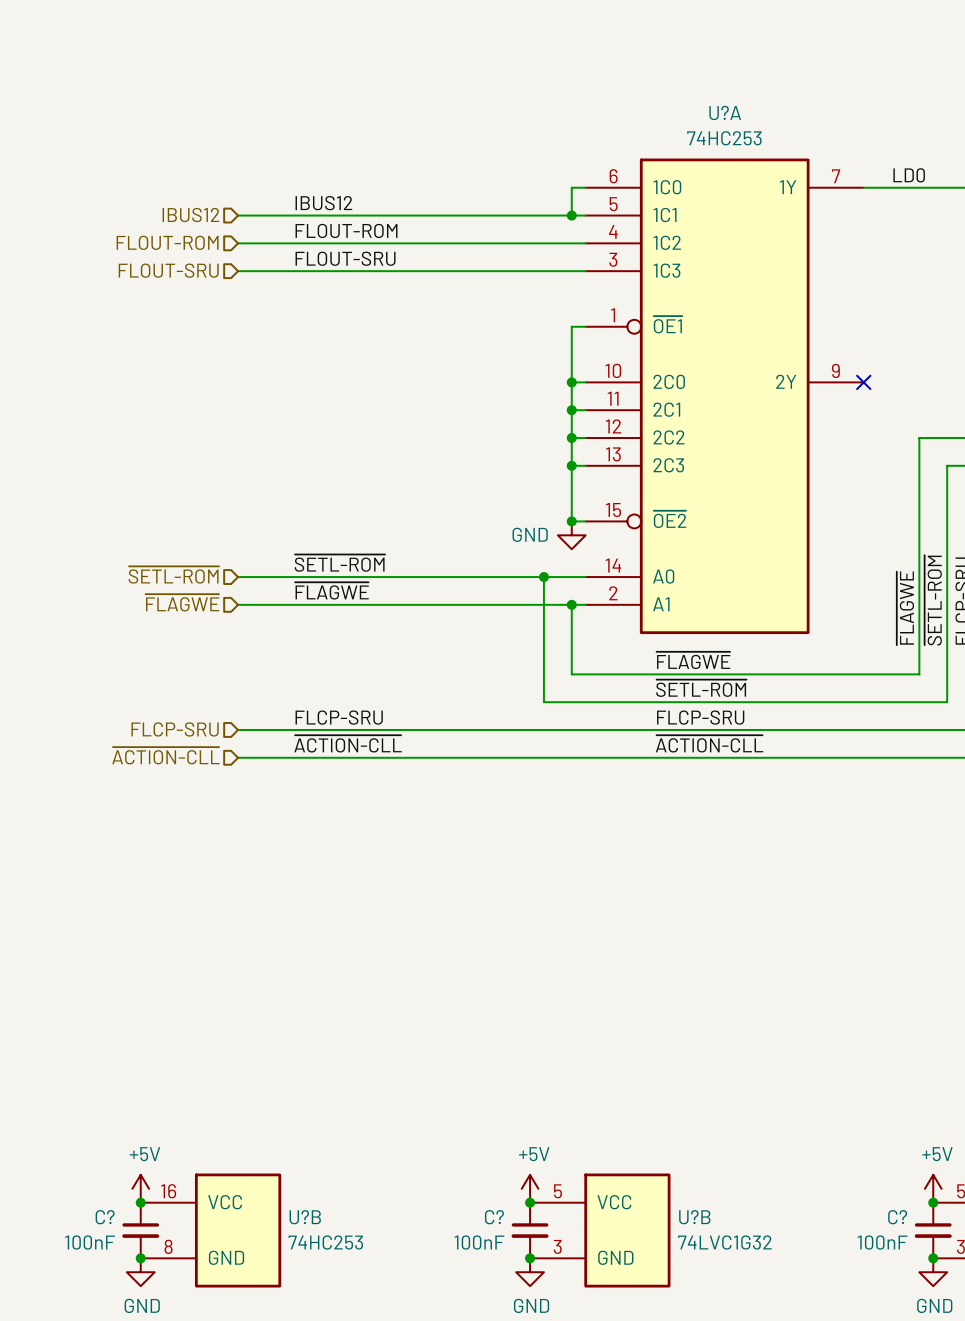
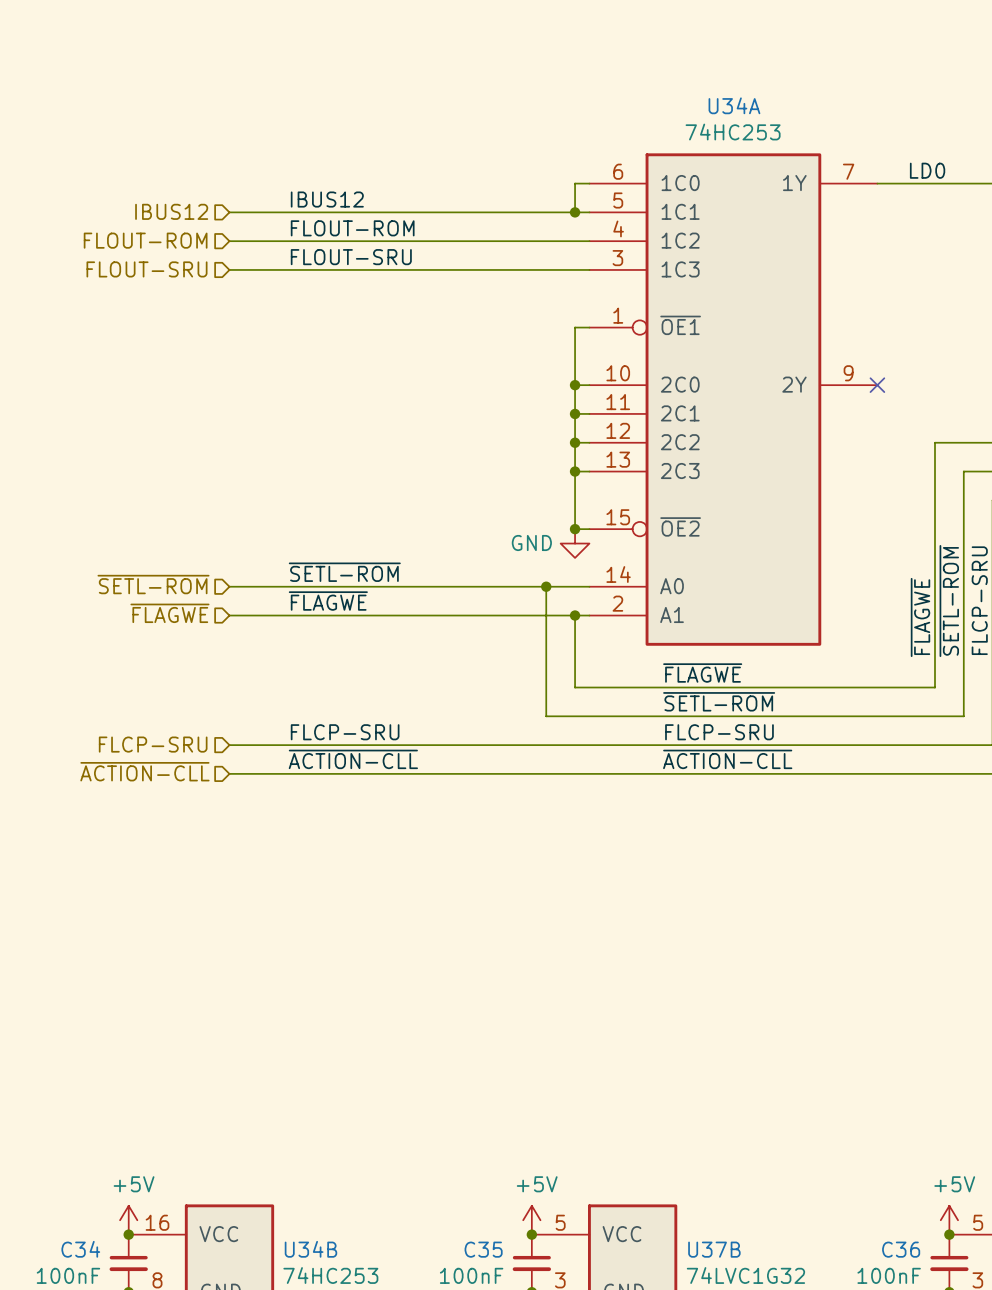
U?A name: U?A (725, 112) -> U34A (734, 105)
C? name: C? (105, 1217) -> C34 (80, 1249)
U?B name: U?B (305, 1217) -> U34B (310, 1249)
C? name: C? (494, 1217) -> C35 (483, 1249)
U?B name: U?B (694, 1217) -> U37B (714, 1249)
C? name: C? (897, 1217) -> C36 (901, 1249)

